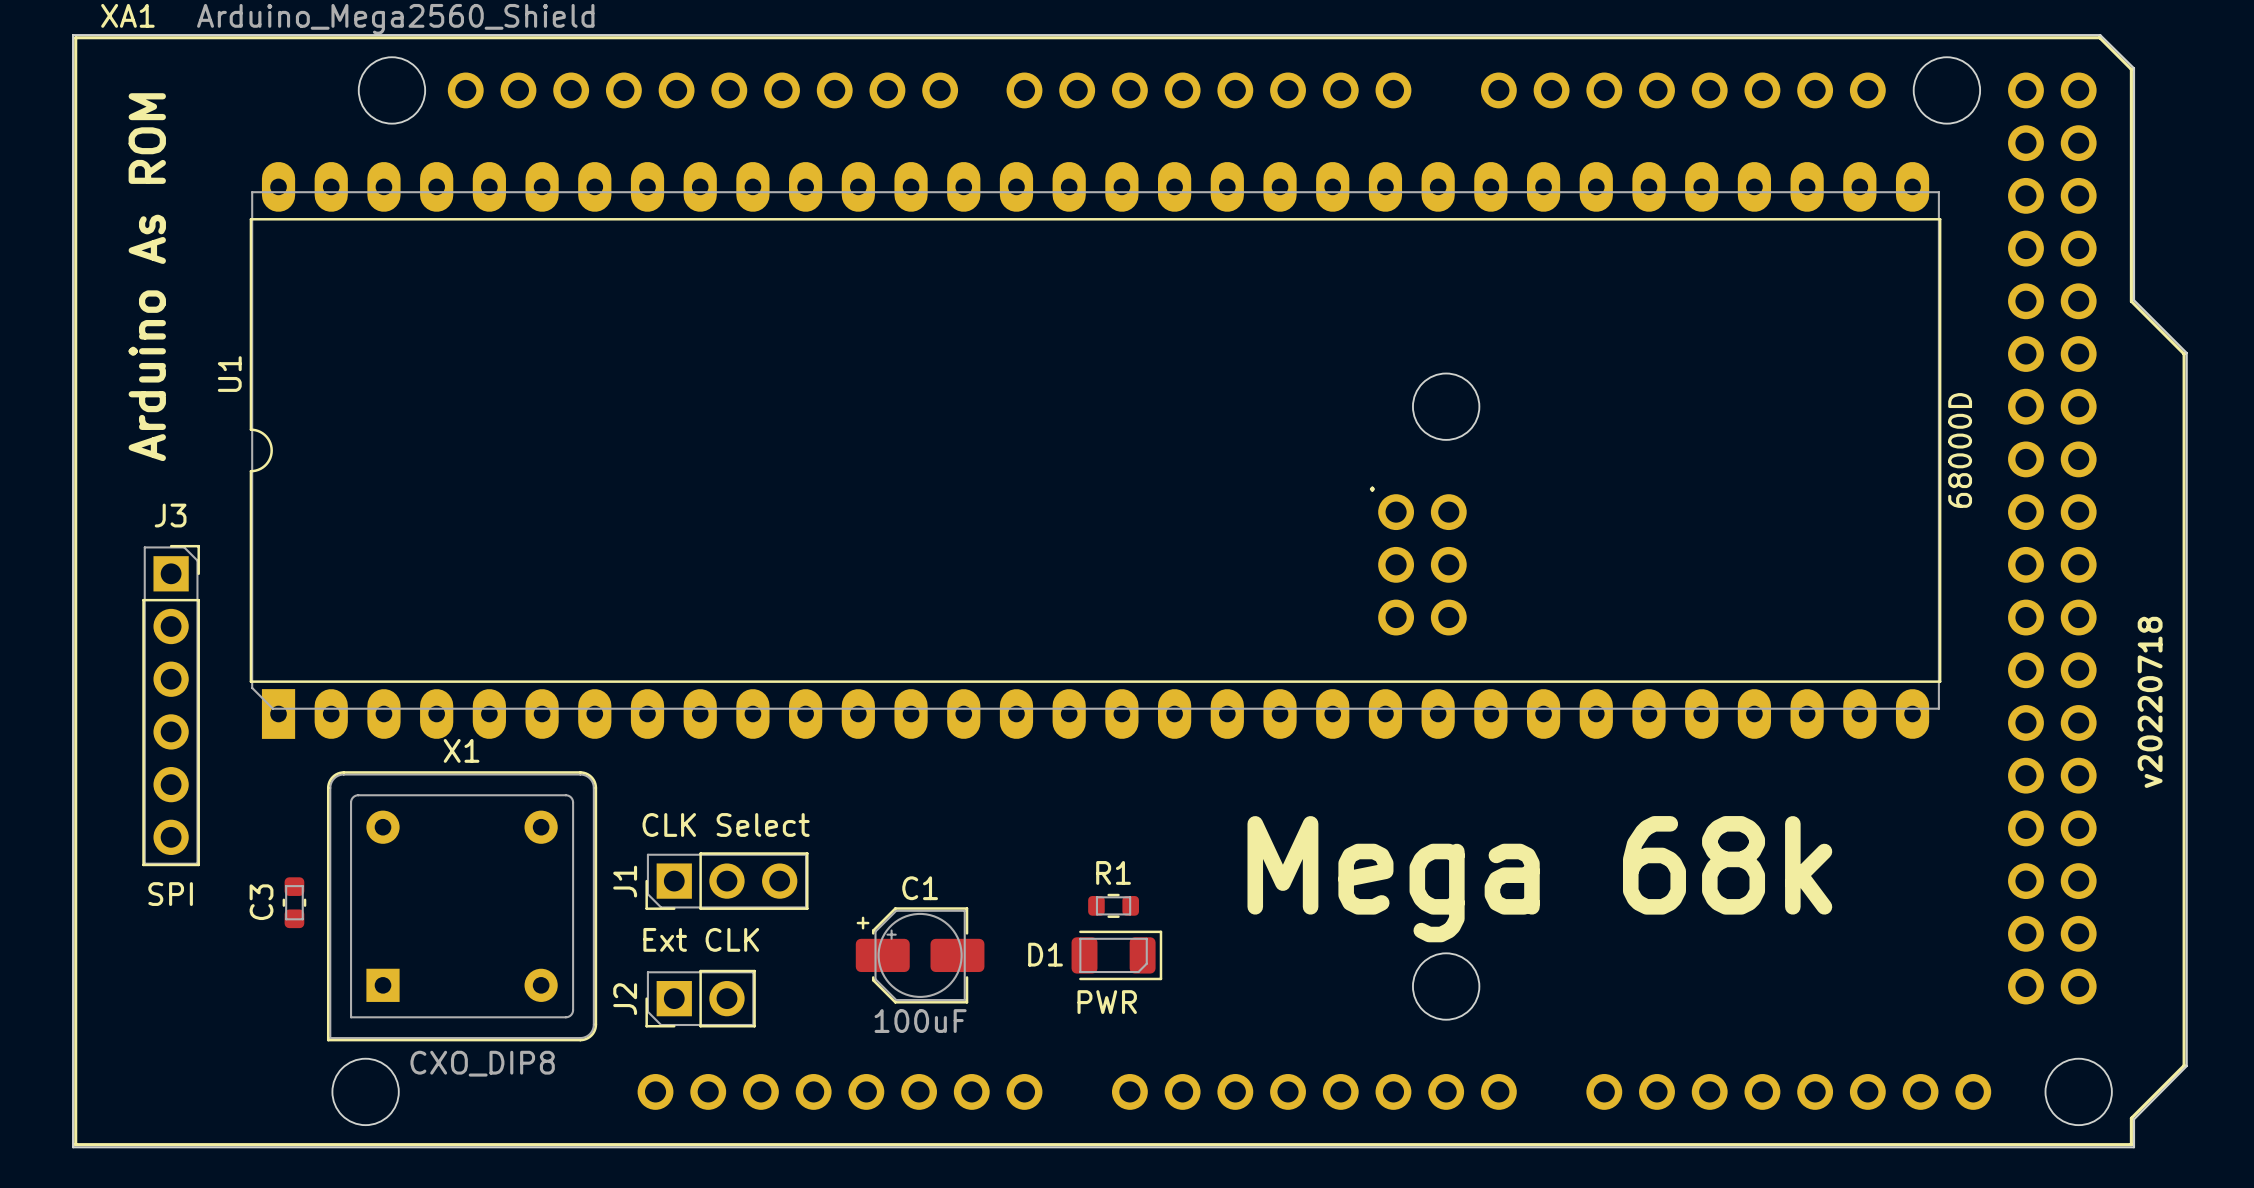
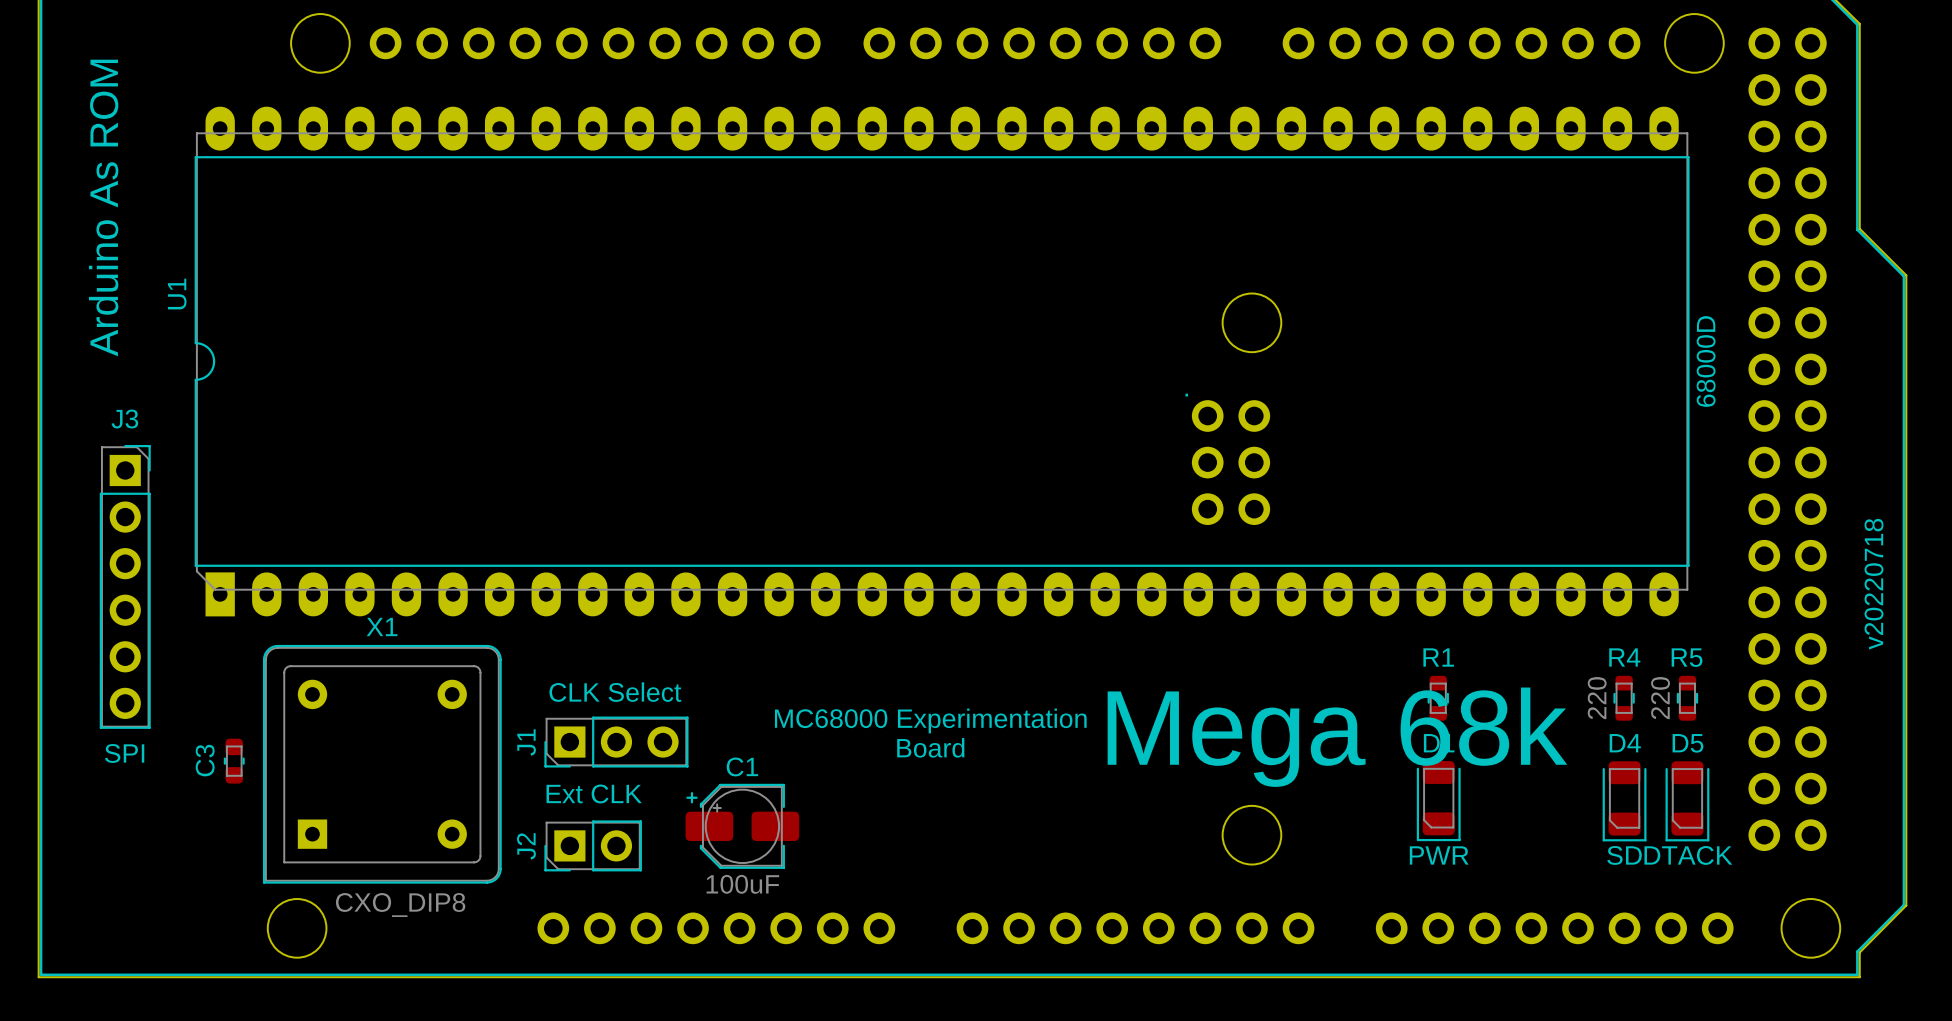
R4: none -> 220 (1624, 698)
R5: none -> 220 (1687, 698)
text: none -> MC68000 Experimentation (930, 720)
text: none -> Board (930, 747)
R1 rotation: 0° (1113, 905) -> 90° clockwise (1438, 698)
R1 position: (1113, 905) -> (1438, 698)
D4: none -> SD (1624, 801)
D5: none -> DTACK (1687, 801)
C1 position: (920, 955) -> (742, 826)
D1 rotation: 0° (1116, 955) -> 90° clockwise (1438, 801)
D1 position: (1116, 955) -> (1438, 801)

